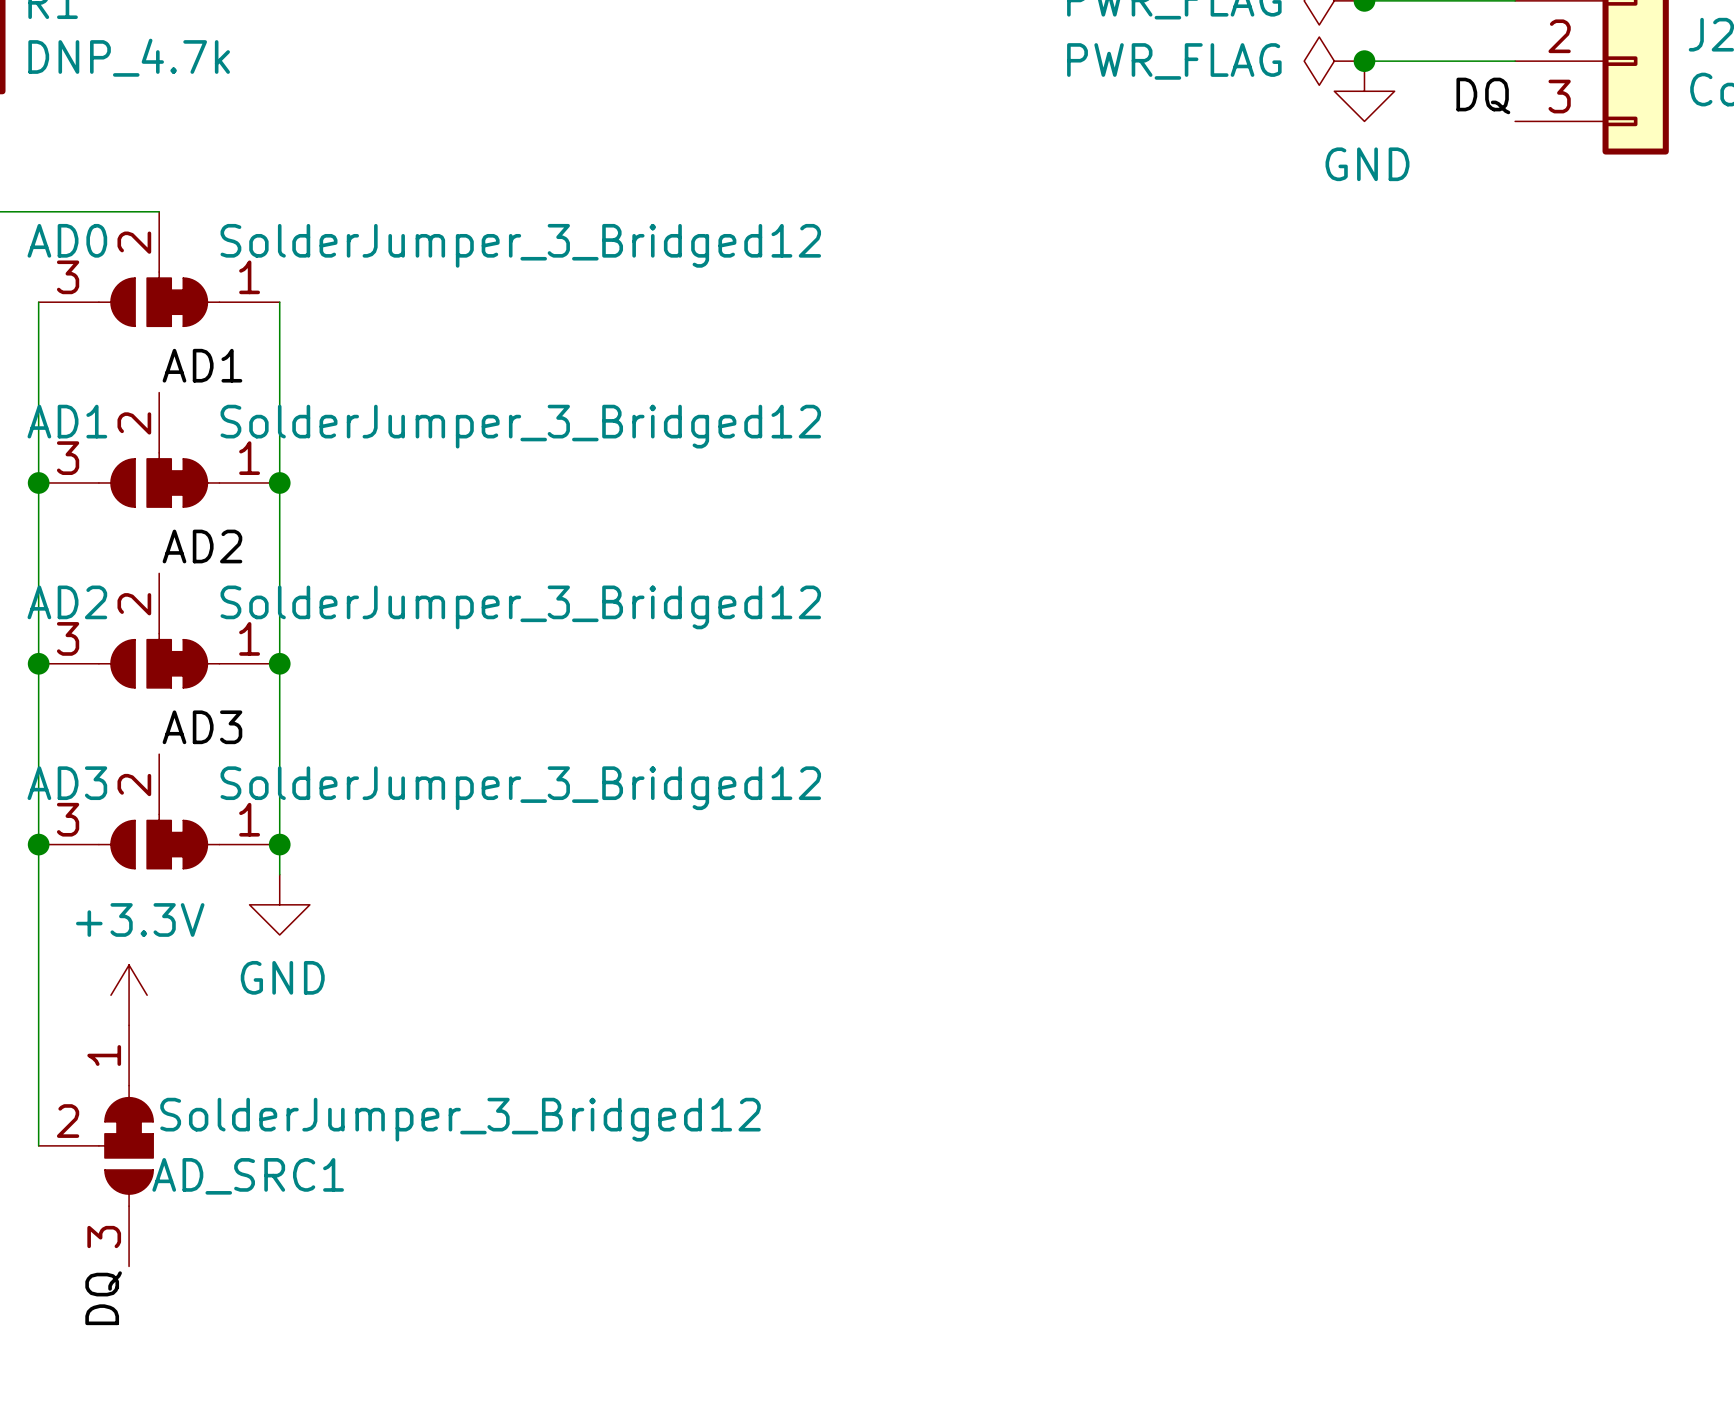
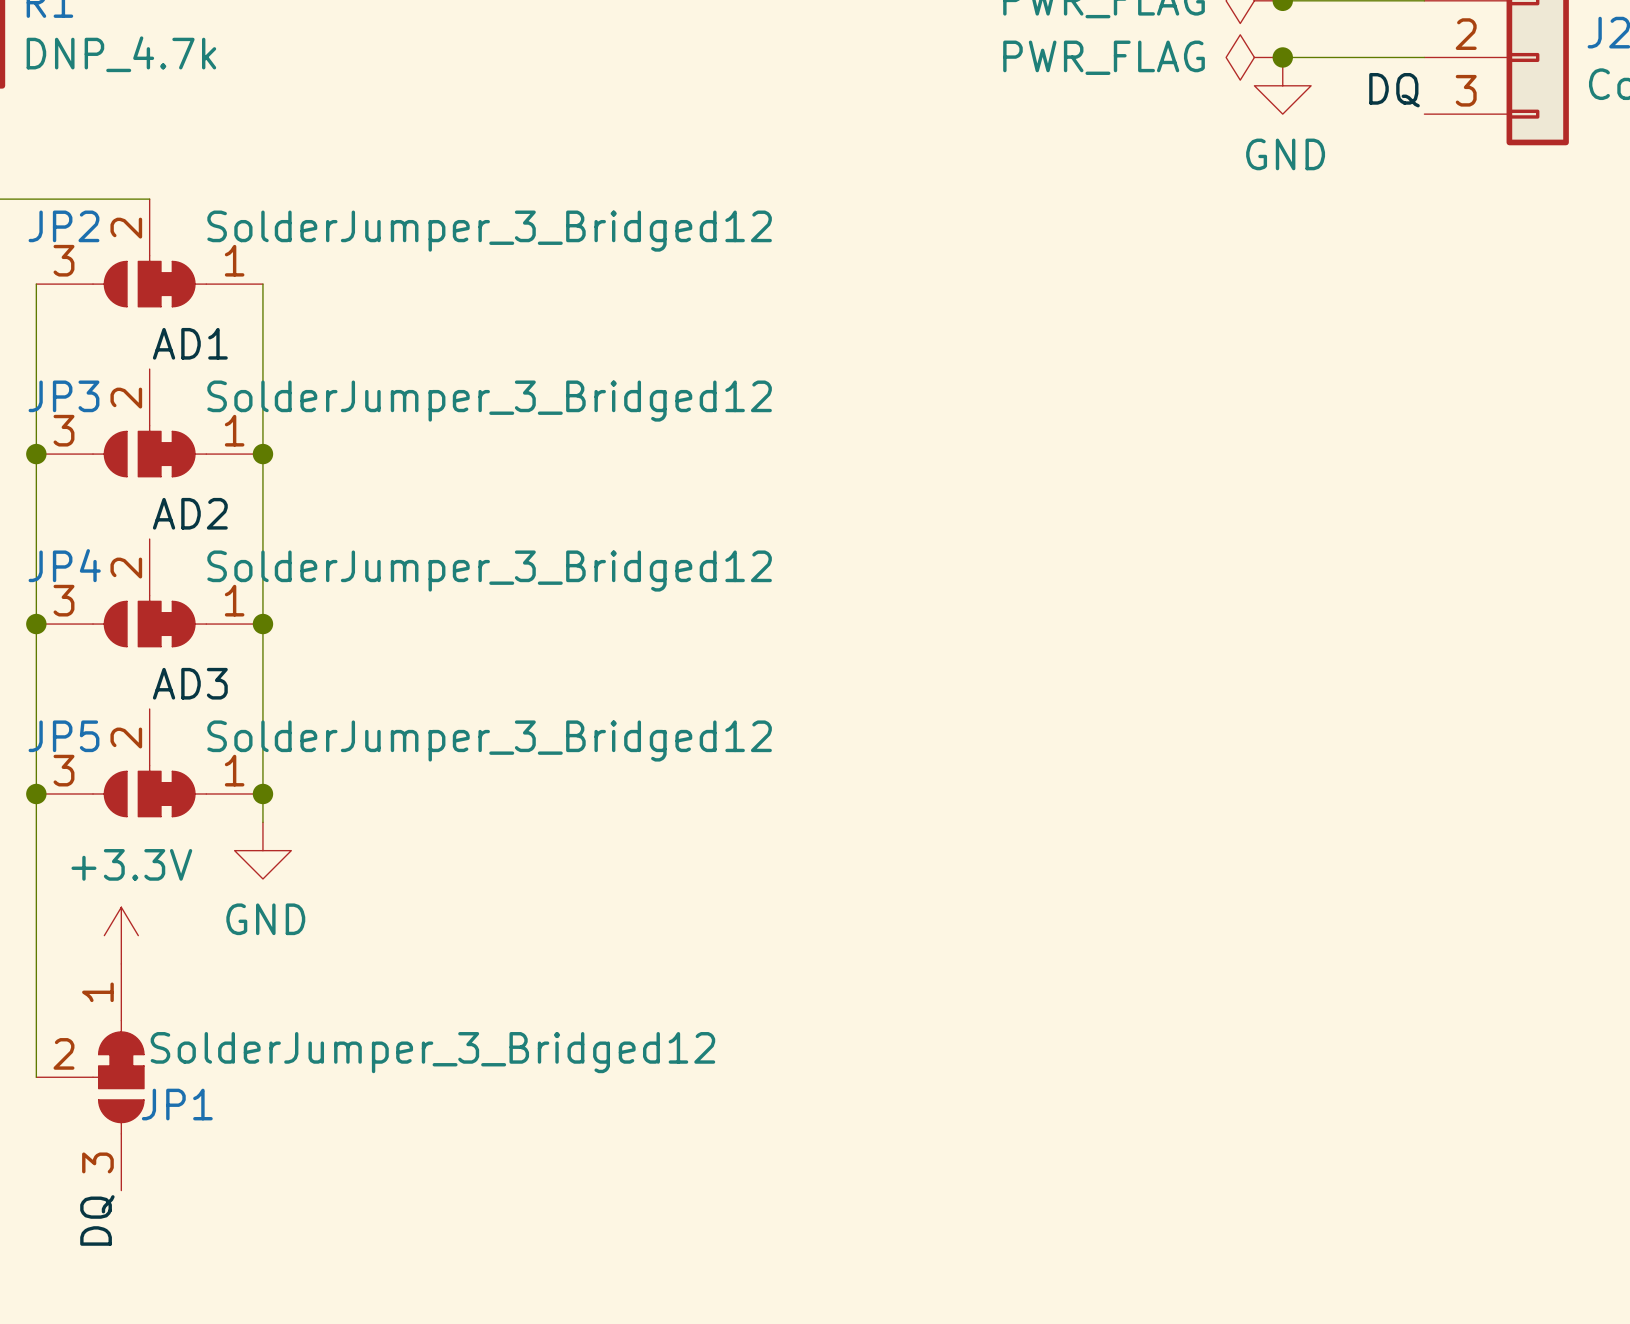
AD0 name: AD0 (67, 240) -> JP2 (64, 226)
AD1 name: AD1 (67, 421) -> JP3 (64, 396)
AD2 name: AD2 (67, 602) -> JP4 (64, 565)
AD3 name: AD3 (67, 783) -> JP5 (64, 736)
AD_SRC1 name: AD_SRC1 (248, 1176) -> JP1 (177, 1104)

